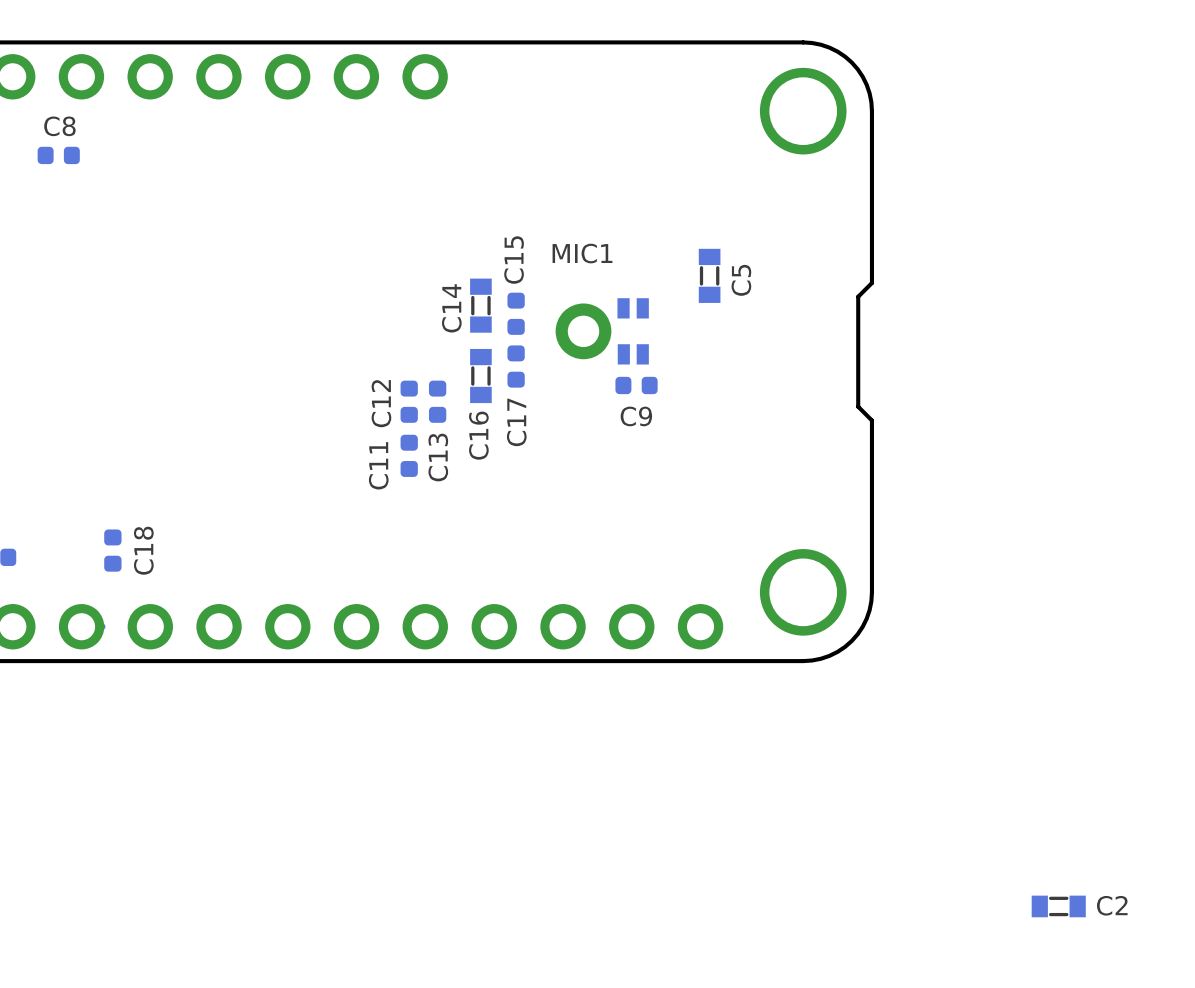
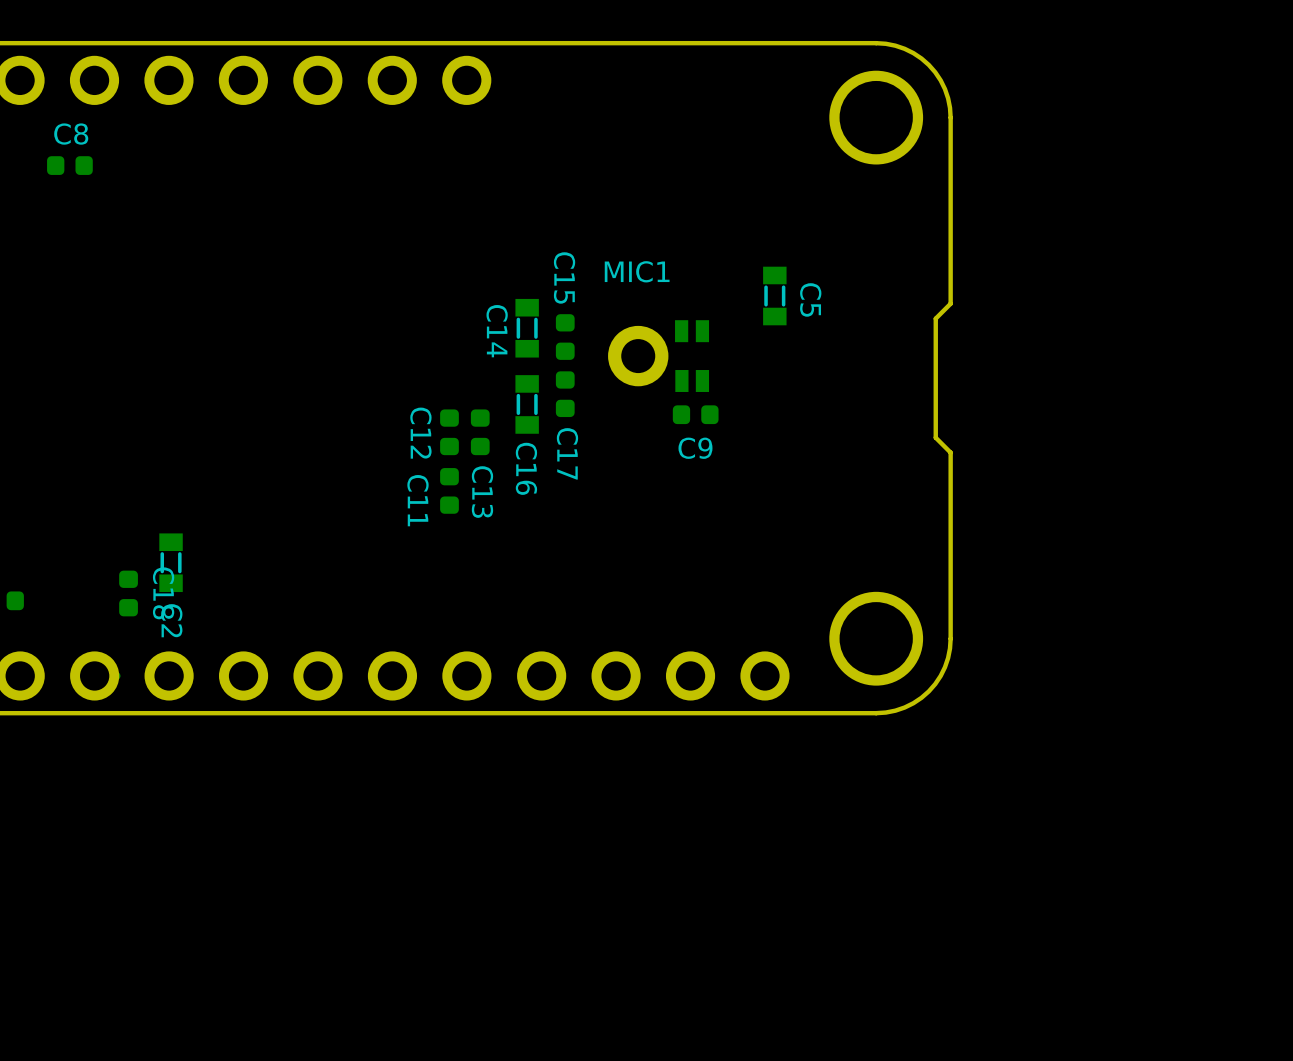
C15 name rotation: 0° (514, 260) -> 180° (564, 277)
C5 name rotation: 0° (741, 280) -> 180° (810, 299)
C14 name rotation: 0° (451, 308) -> 180° (497, 331)
C12 name rotation: 0° (381, 403) -> 180° (420, 433)
C17 name rotation: 0° (516, 422) -> 180° (567, 453)
C16 name rotation: 0° (478, 435) -> 180° (526, 468)
C13 name rotation: 0° (438, 457) -> 180° (482, 492)
C11 name rotation: 0° (378, 465) -> 180° (417, 500)
C18 name rotation: 0° (143, 550) -> 180° (163, 593)
C2 rotation: 0° (1058, 906) -> 90° clockwise (171, 562)
C2 position: (1058, 906) -> (171, 562)

